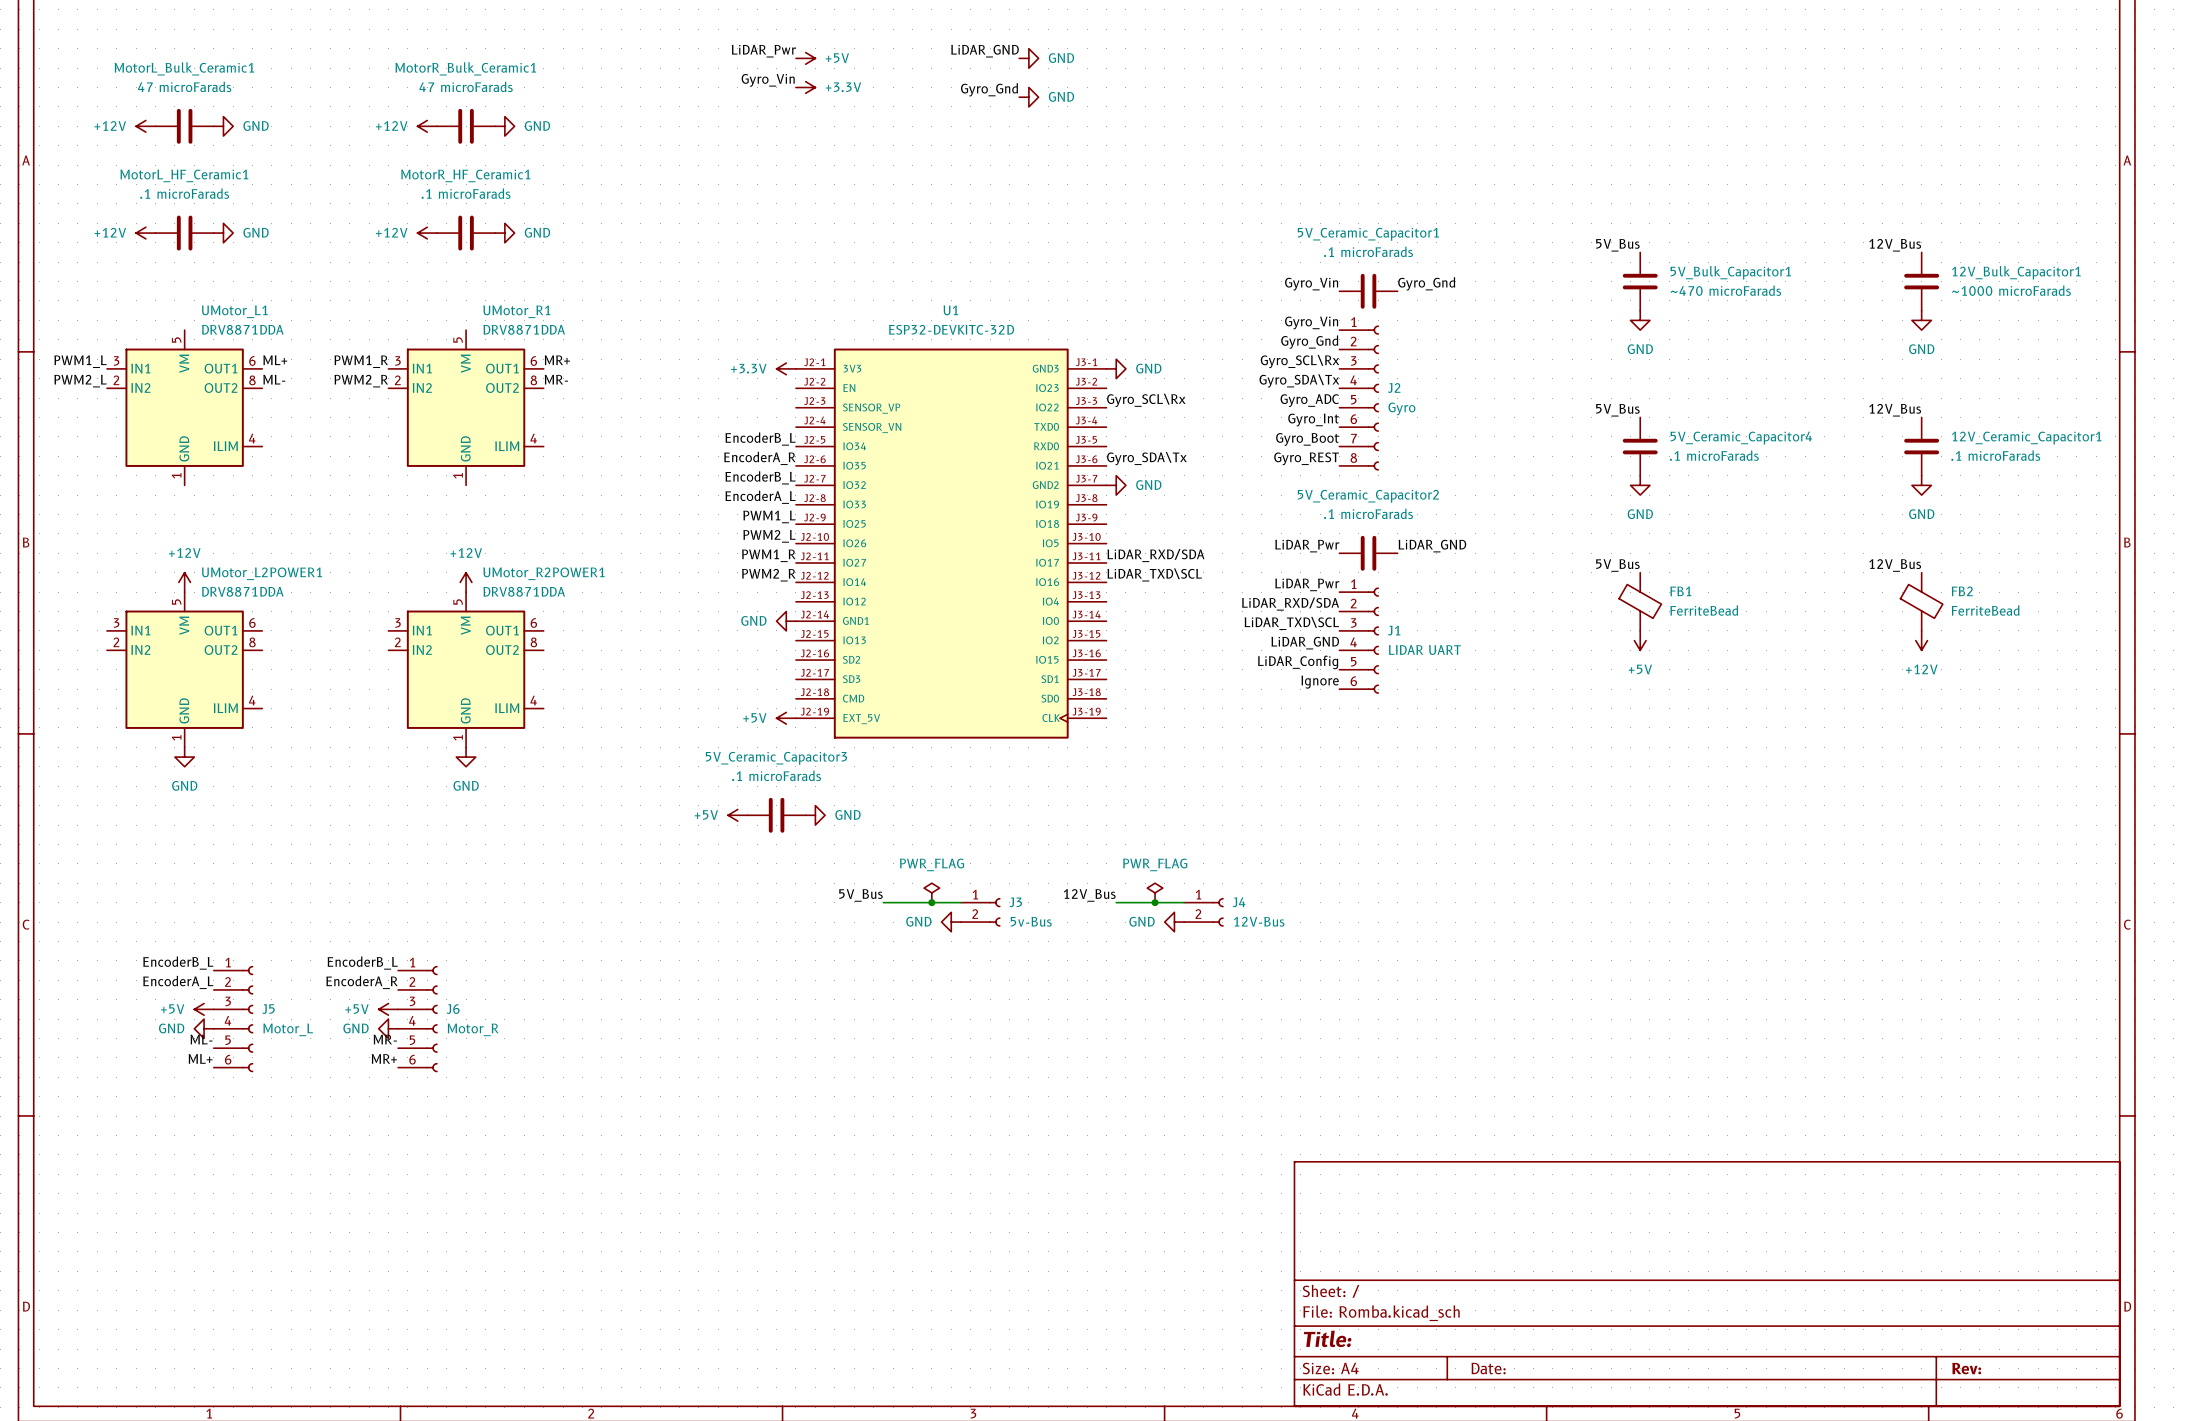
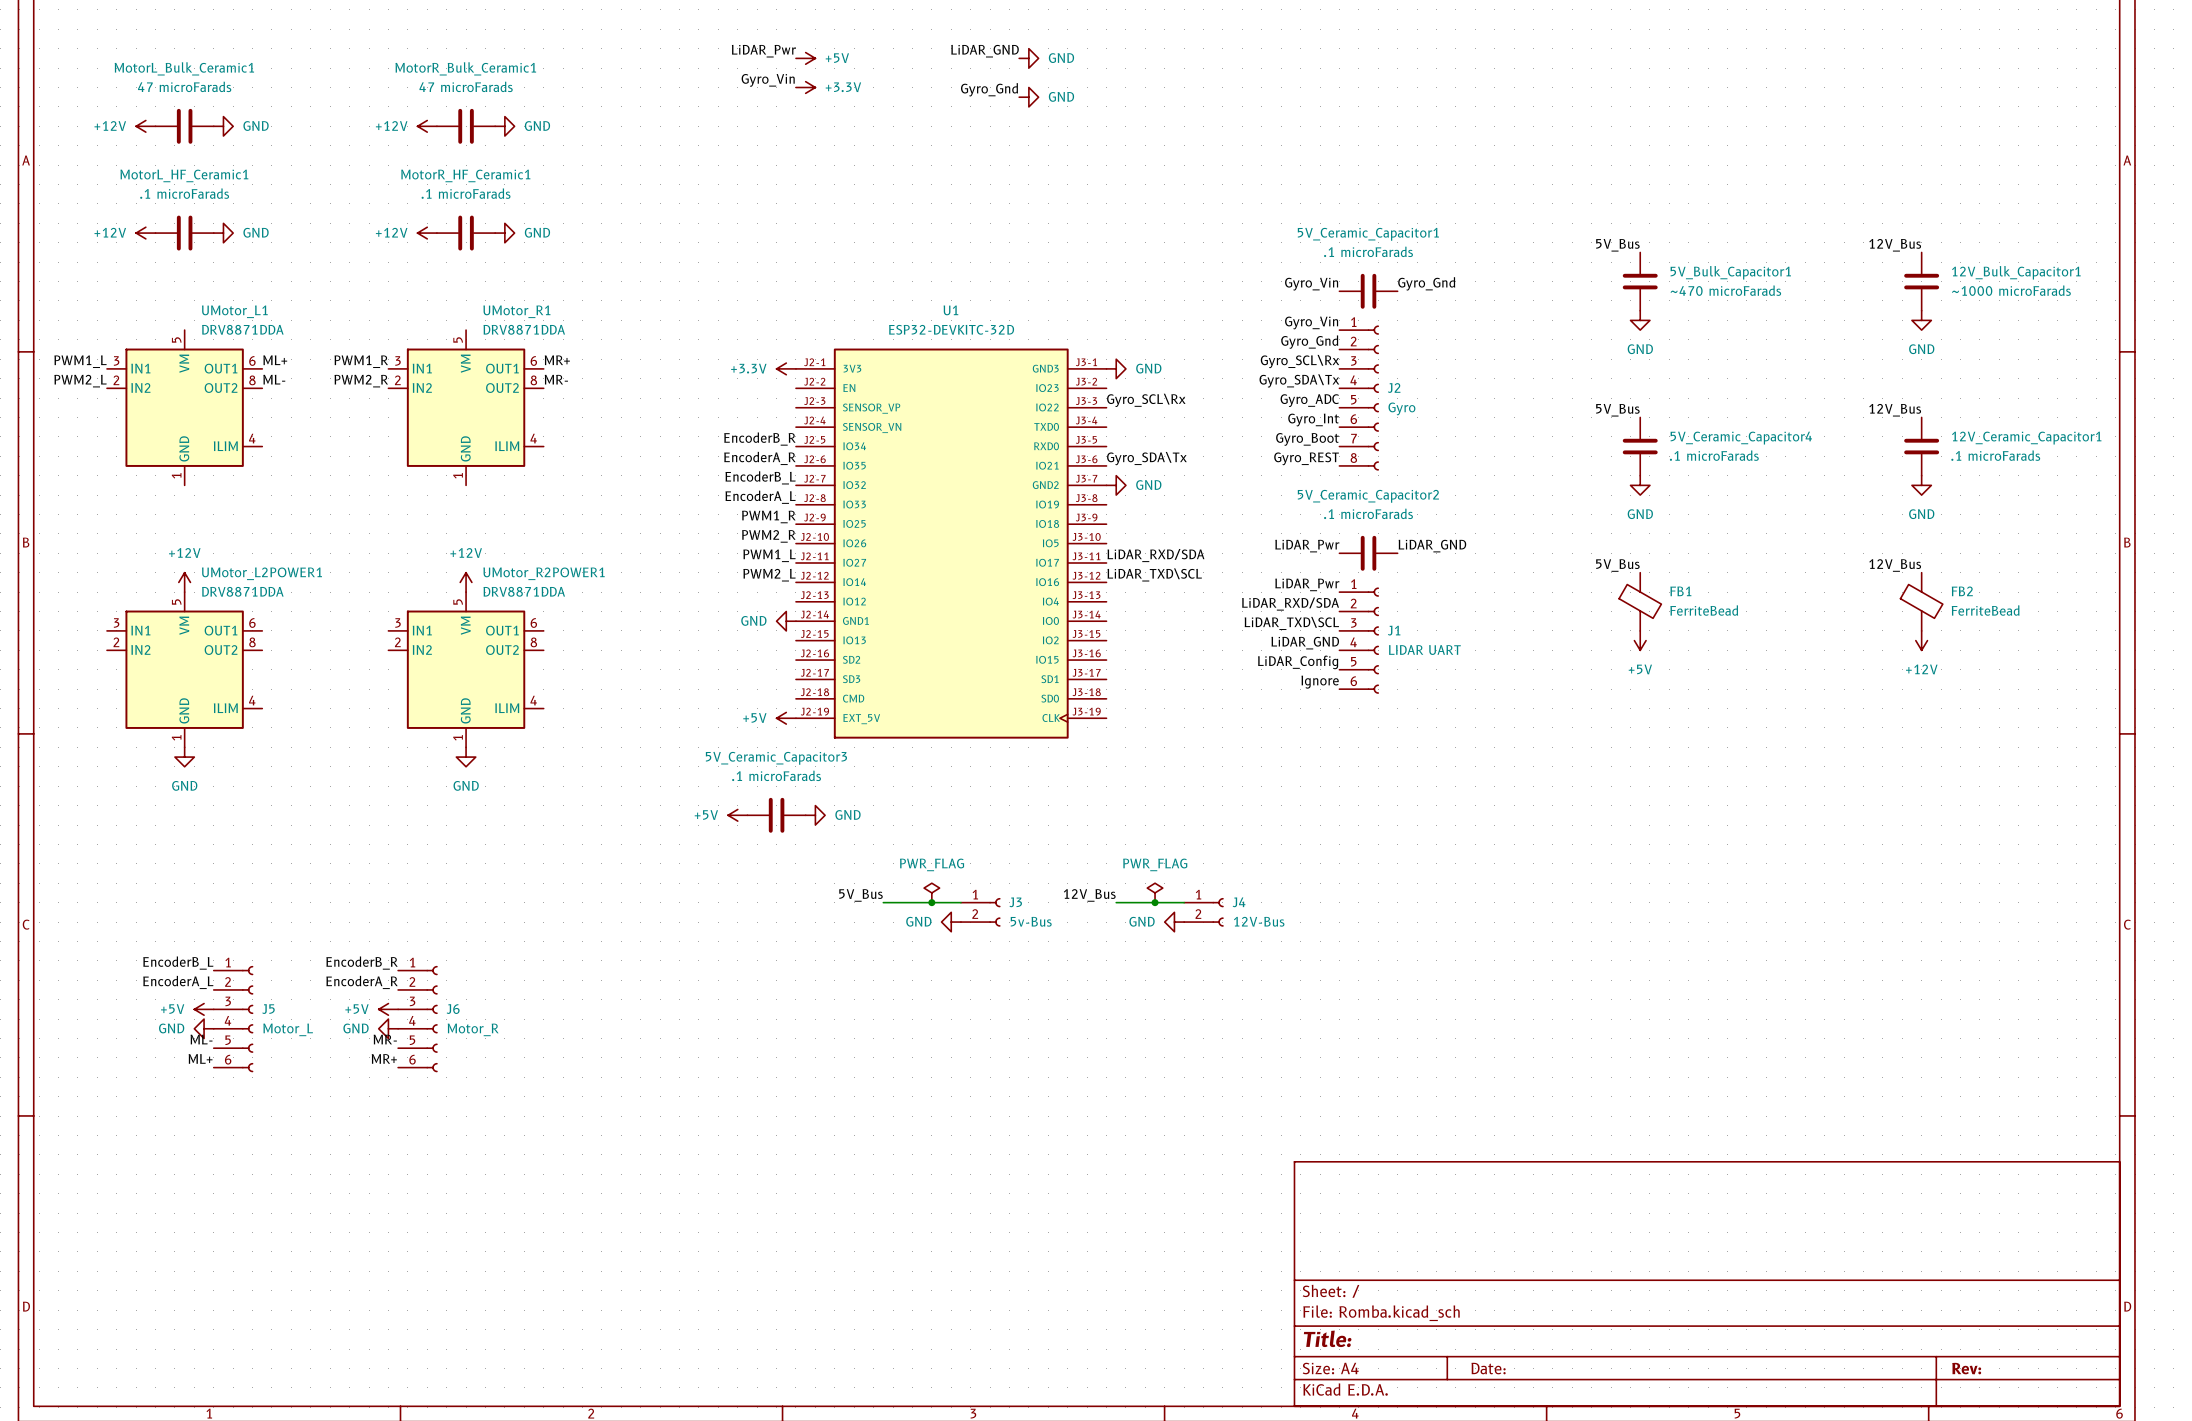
label: EncoderB_L (760, 439) -> EncoderB_R (759, 439)
label: PWM1_L (769, 516) -> PWM1_R (768, 516)
label: PWM2_L (769, 536) -> PWM2_R (768, 536)
label: PWM1_R (768, 555) -> PWM1_L (769, 555)
label: PWM2_R (768, 575) -> PWM2_L (769, 575)
label: EncoderB_L (362, 963) -> EncoderB_R (362, 963)

